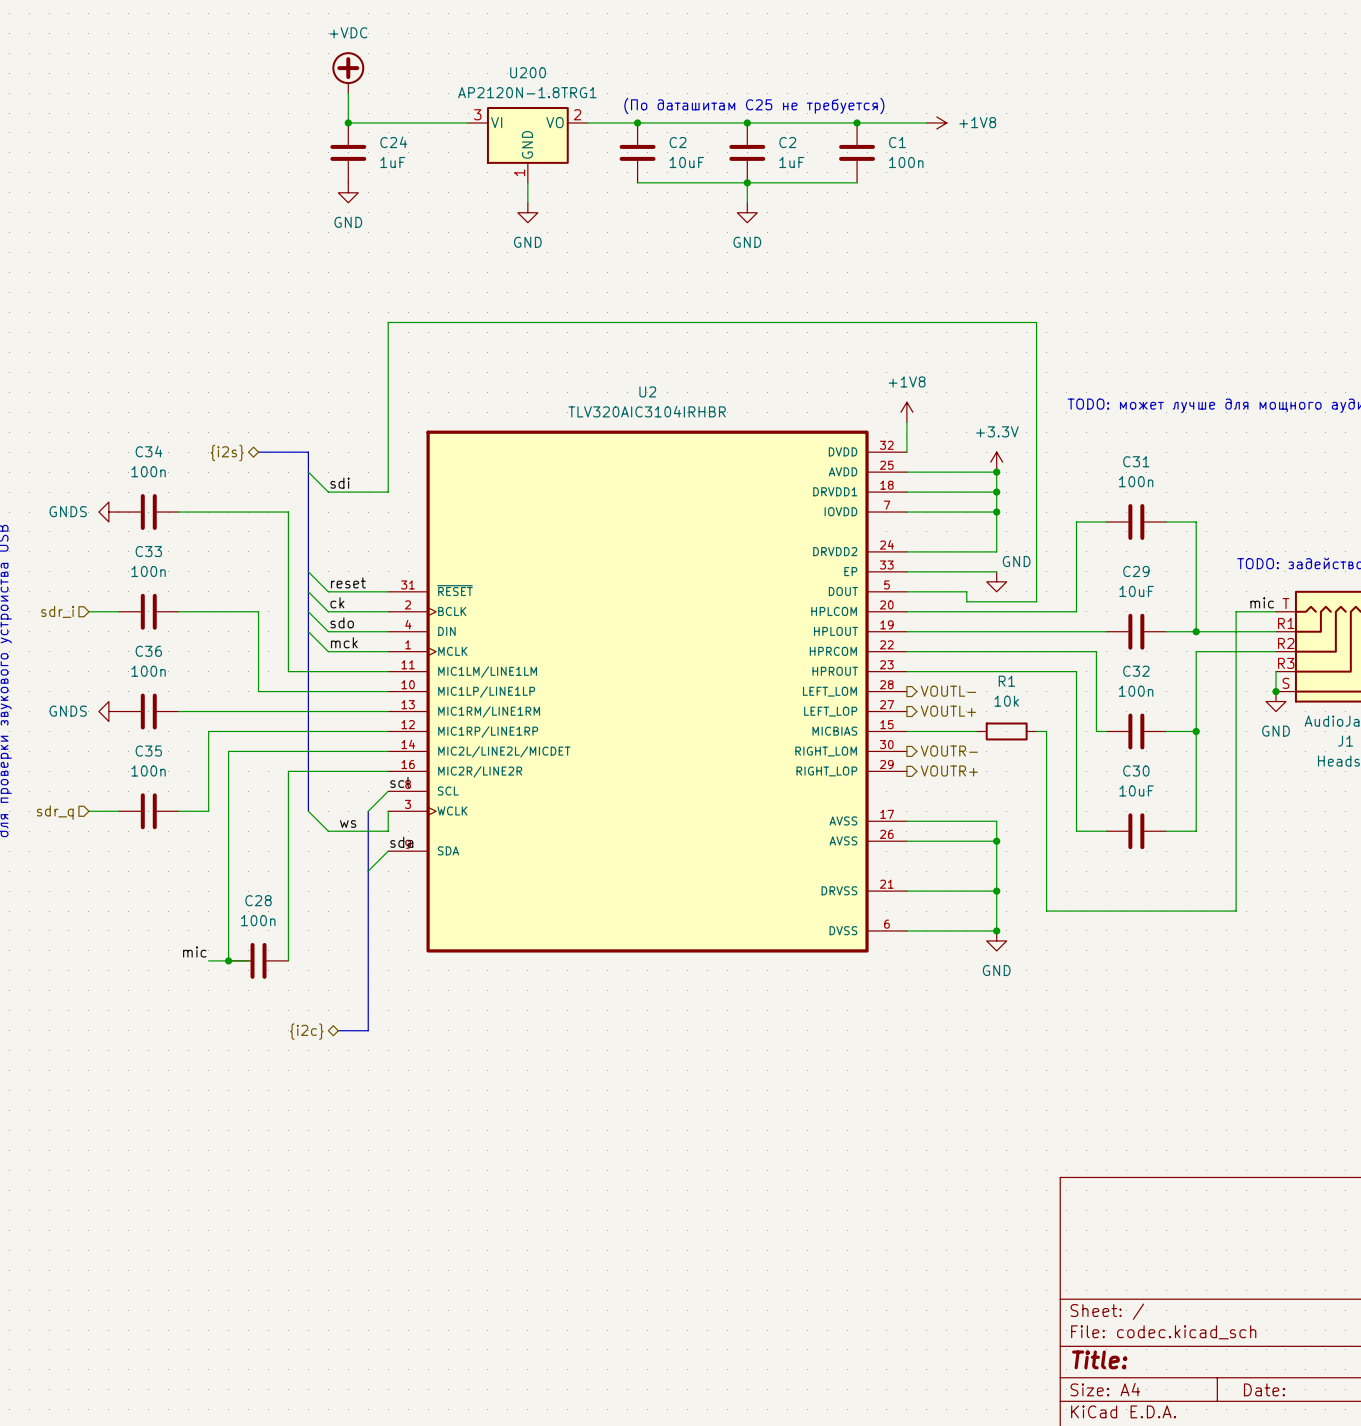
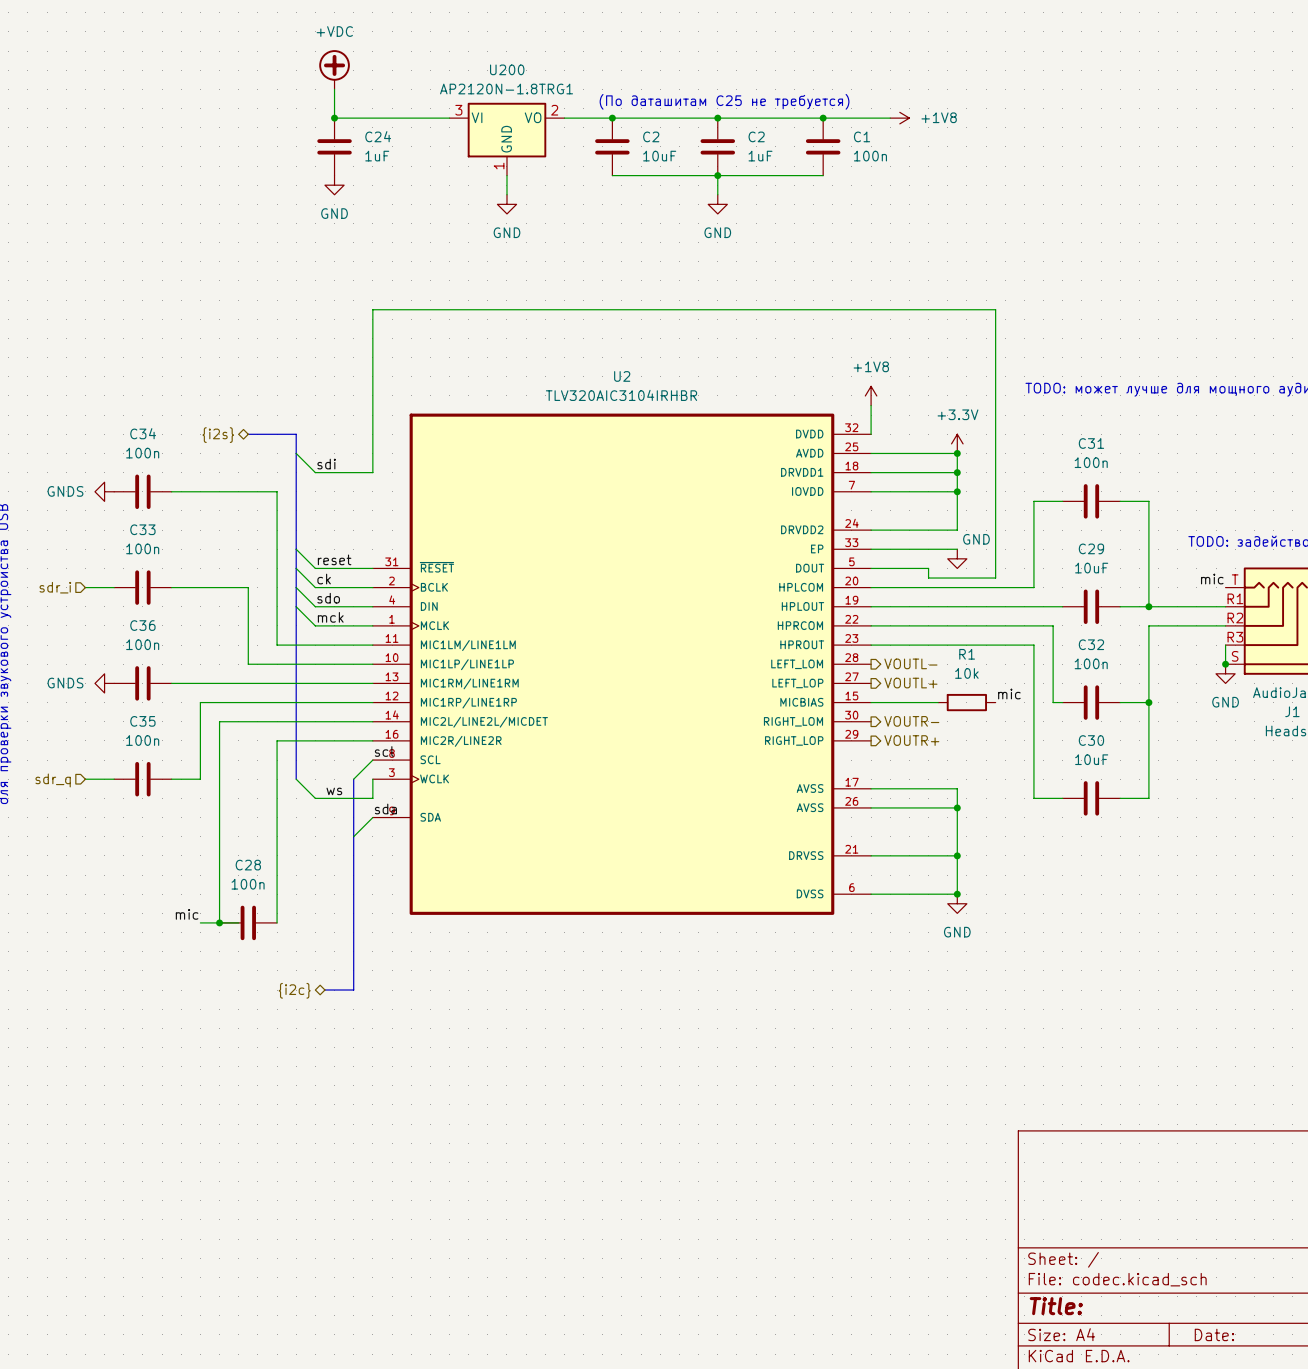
wire: (1276, 611) (1236, 611) (1236, 911) (1046, 911) (1046, 731) (1036, 731) -> none
label: none -> mic (1009, 694)

